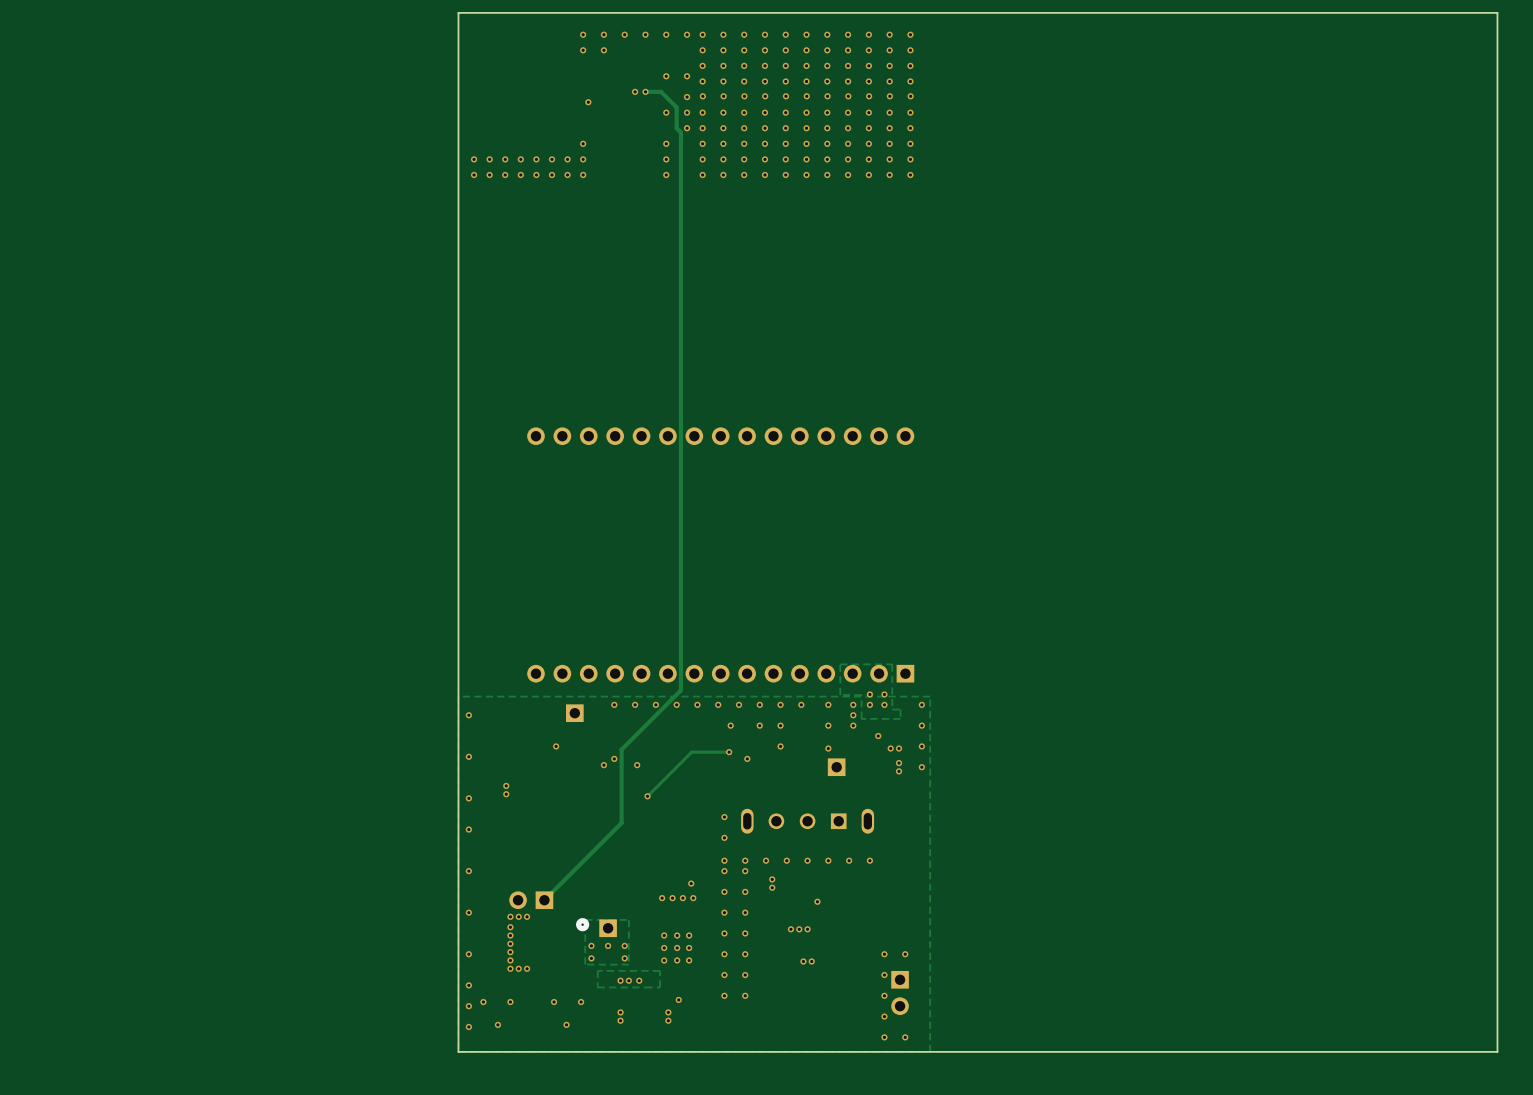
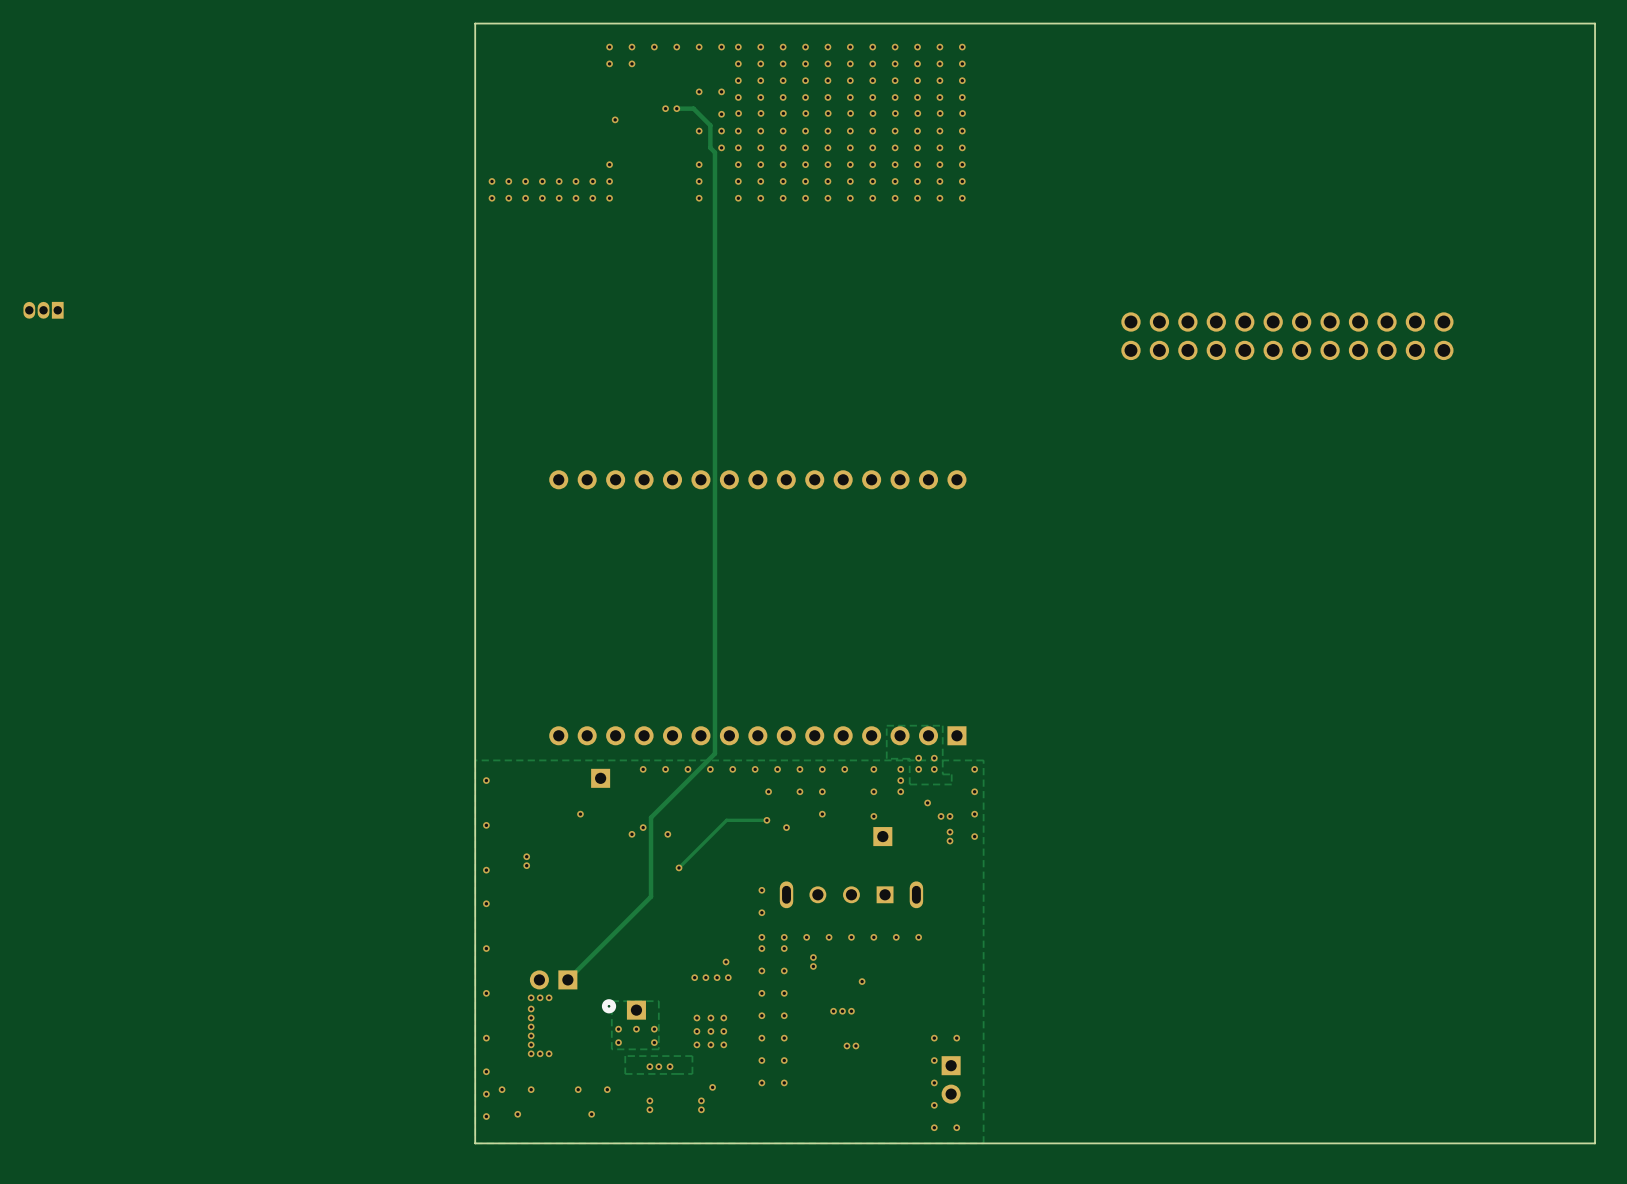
part: none -> (43, 310)
part: none -> (1287, 336)

